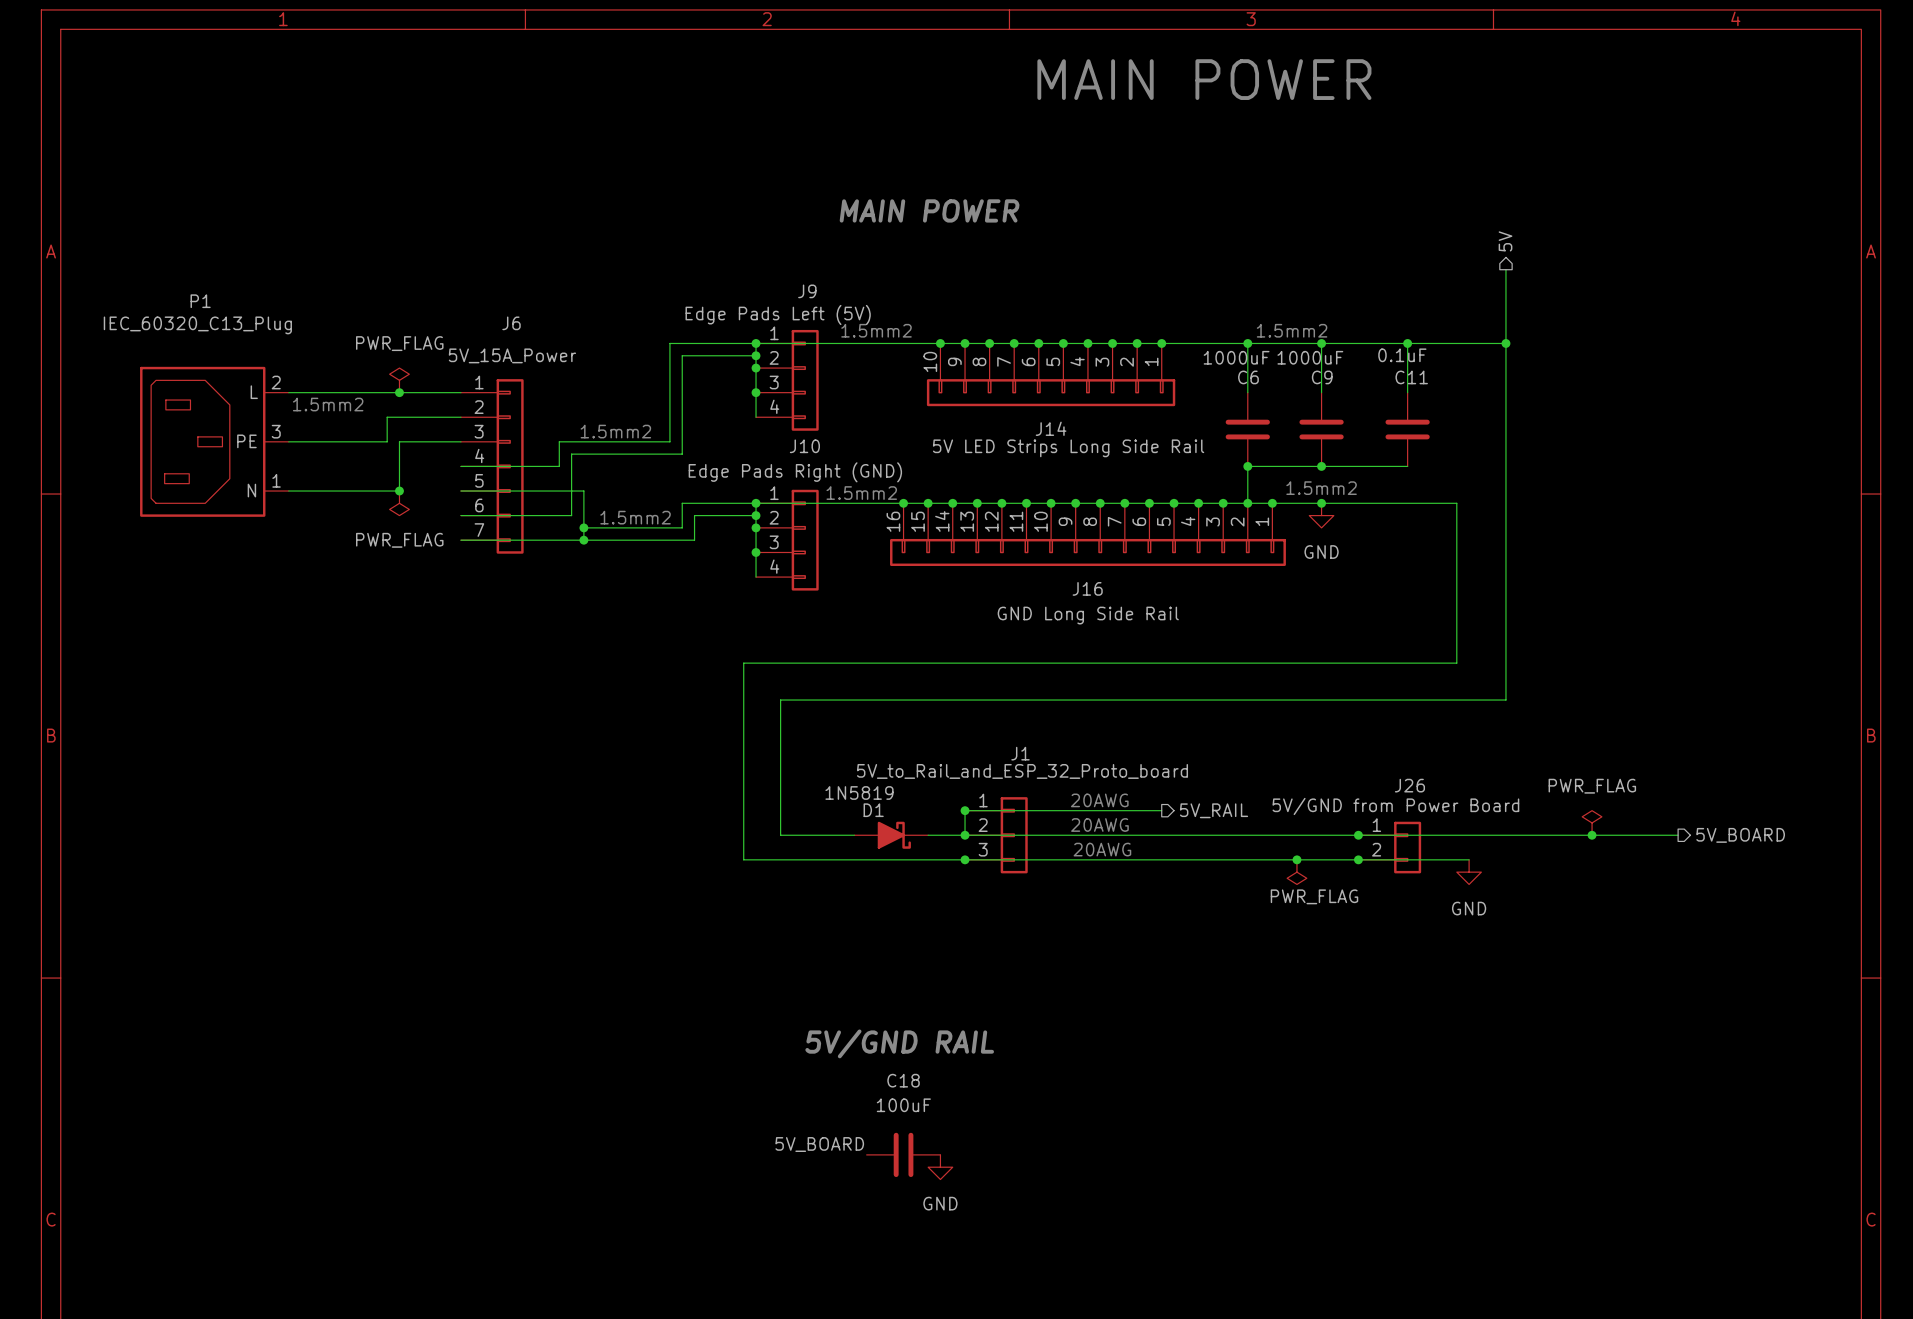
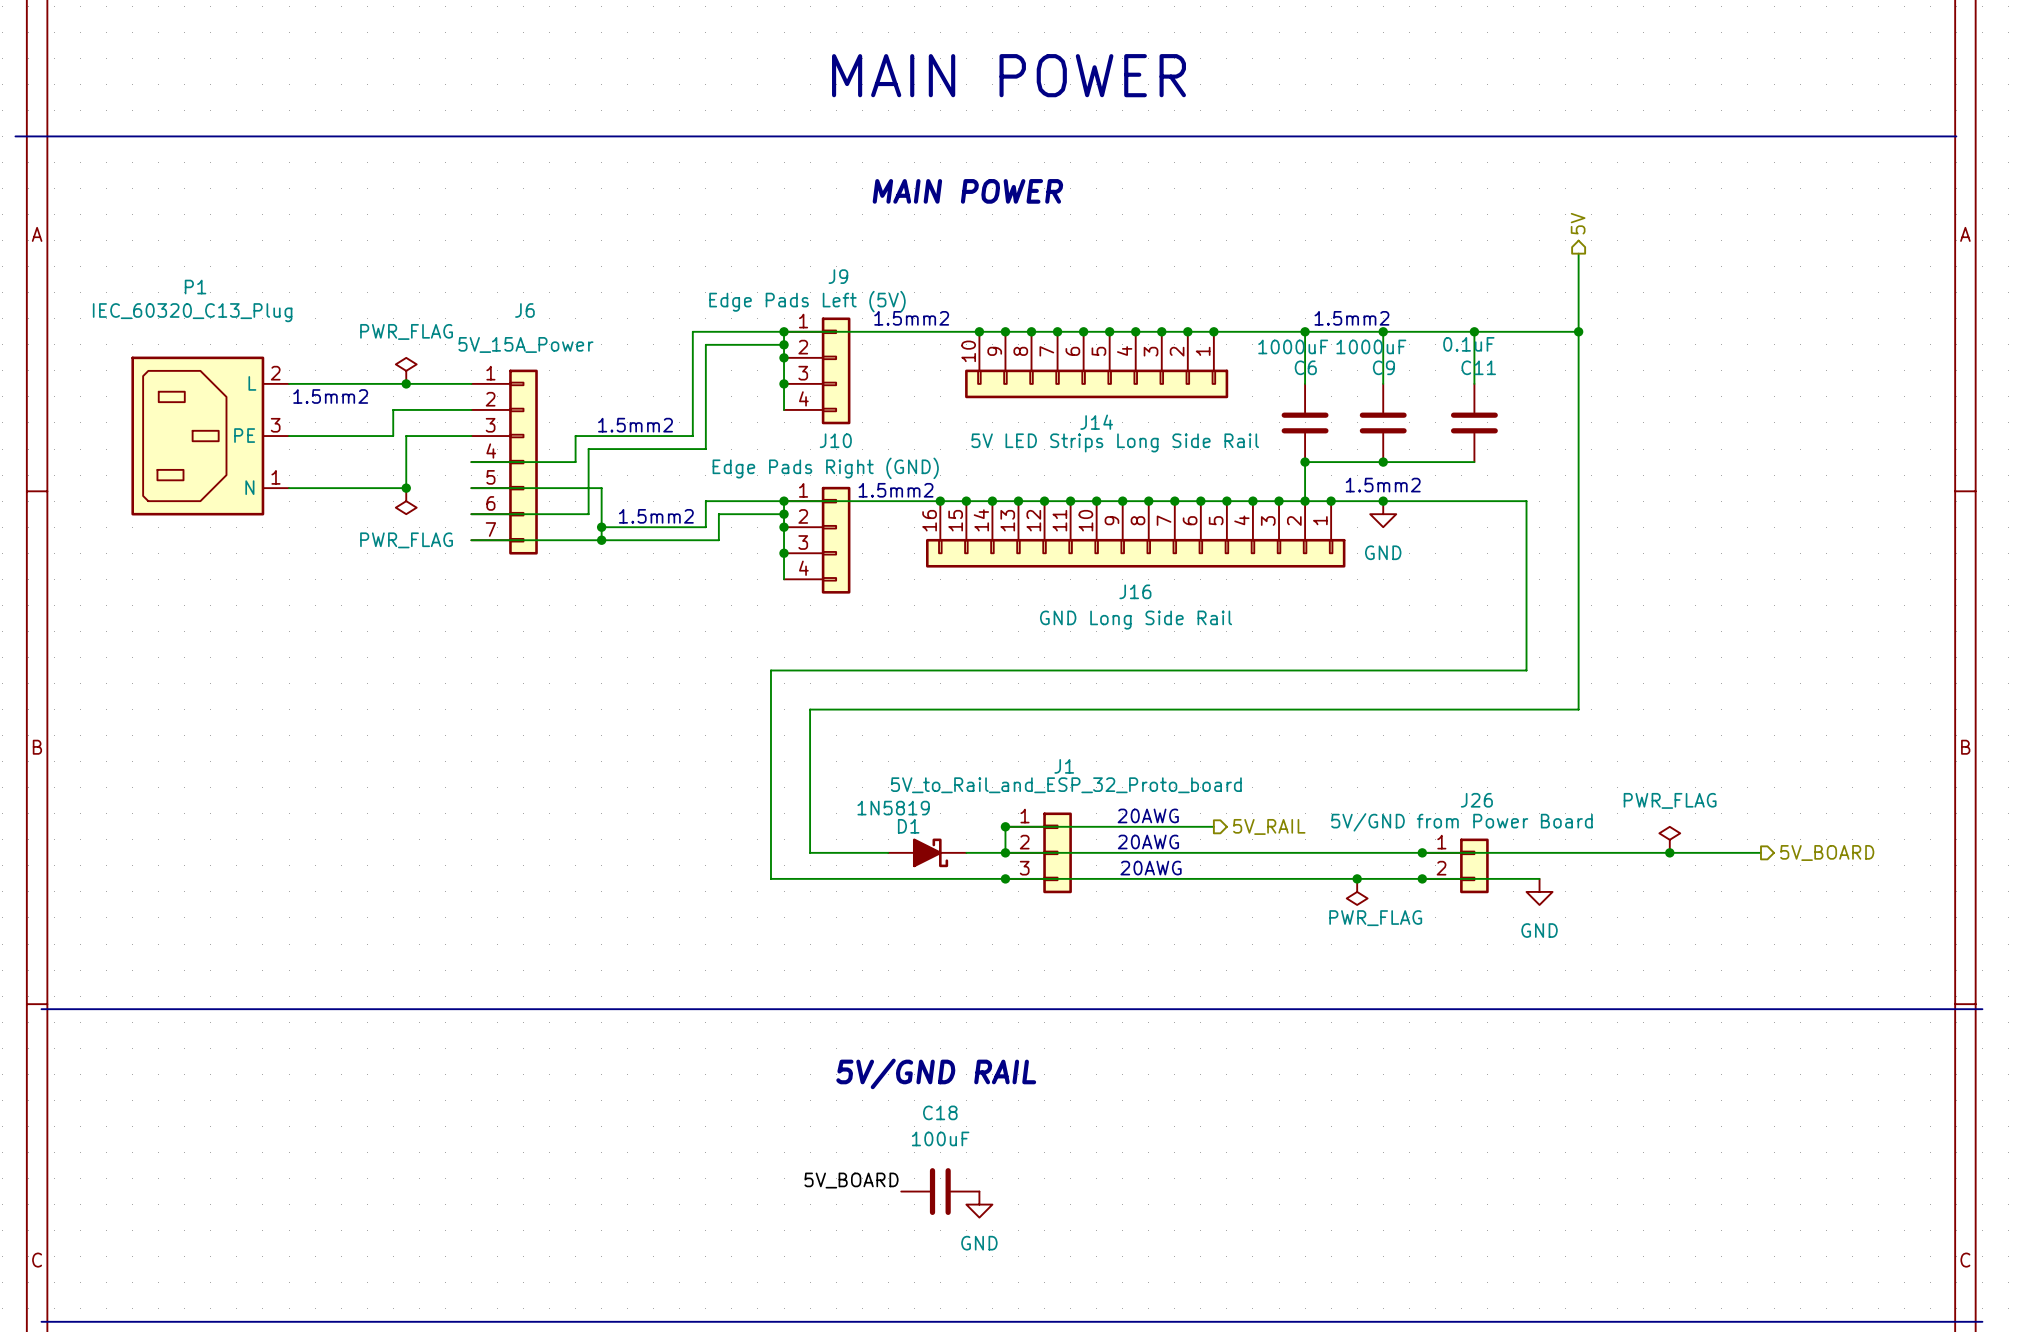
text position: MAIN POWER (1204, 79) -> MAIN POWER (1008, 75)
line: none -> (15, 136) (1956, 136)
line: none -> (41, 1009) (1982, 1009)
line: none -> (41, 1321) (1982, 1321)

